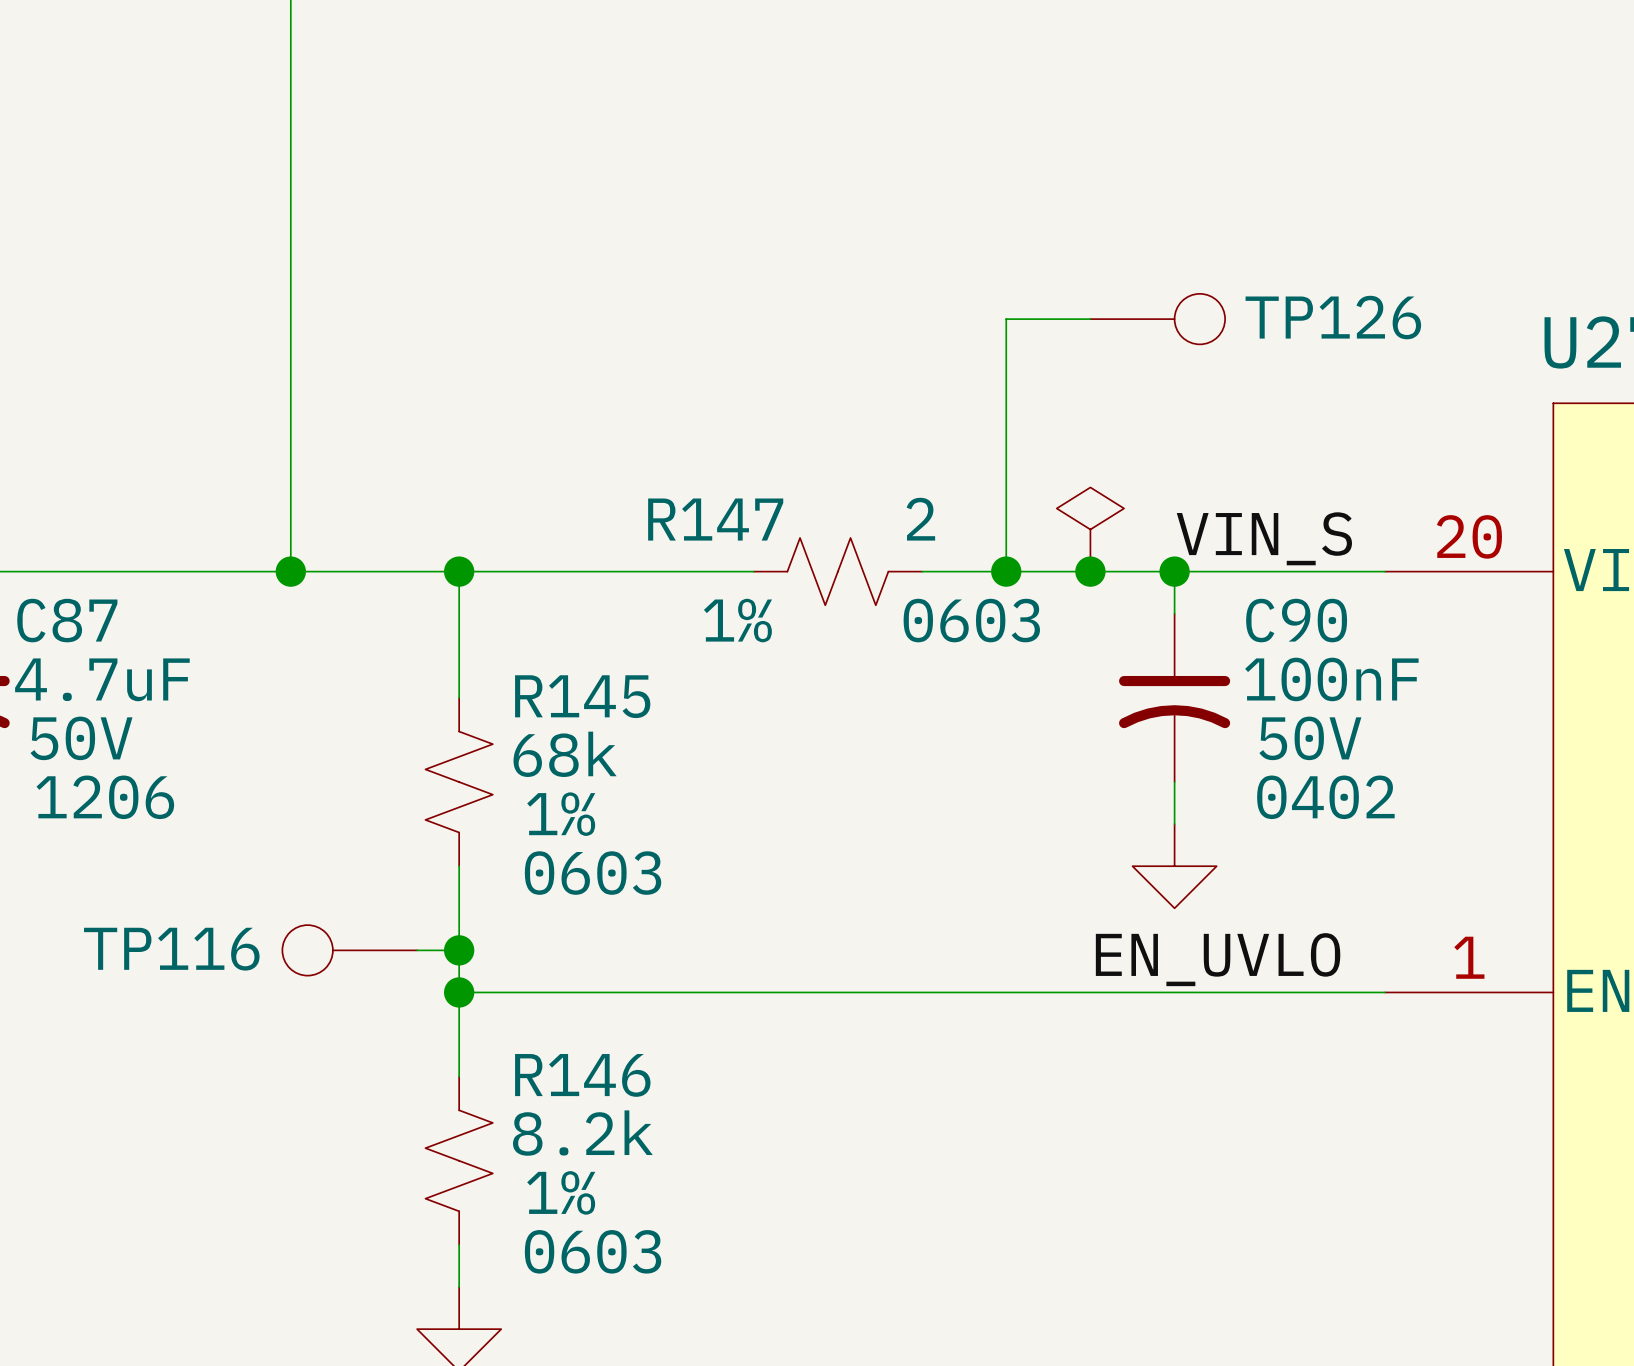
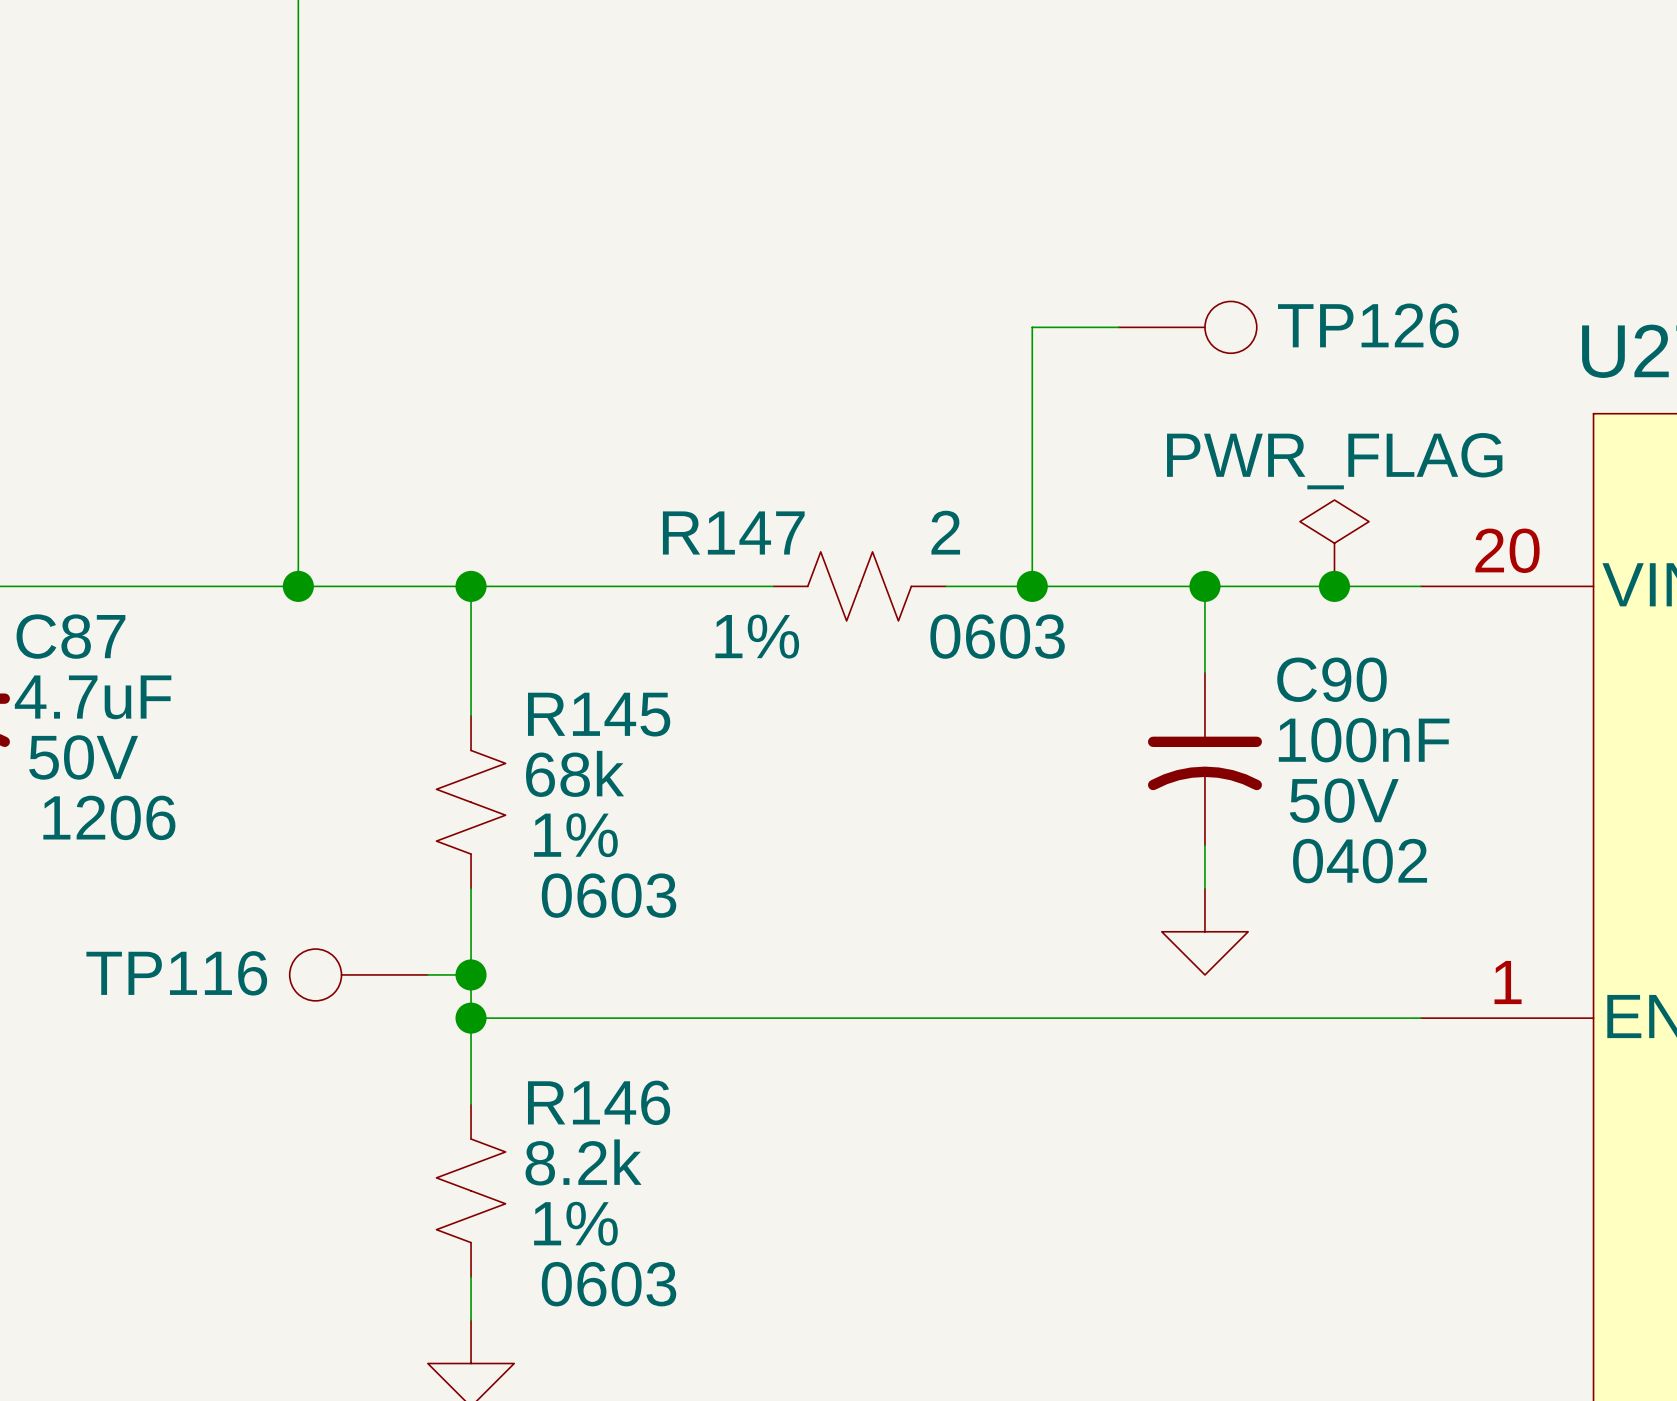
power symbol: (1090, 529) -> none
power symbol: none -> PWR_FLAG (1334, 543)
label: VIN_S (1264, 538) -> none
junction: (1090, 571) -> none
junction: none -> (1334, 586)
C90 position: (1174, 697) -> (1204, 759)
power symbol position: (1174, 866) -> (1204, 931)
label: EN_UVLO (1218, 959) -> none

